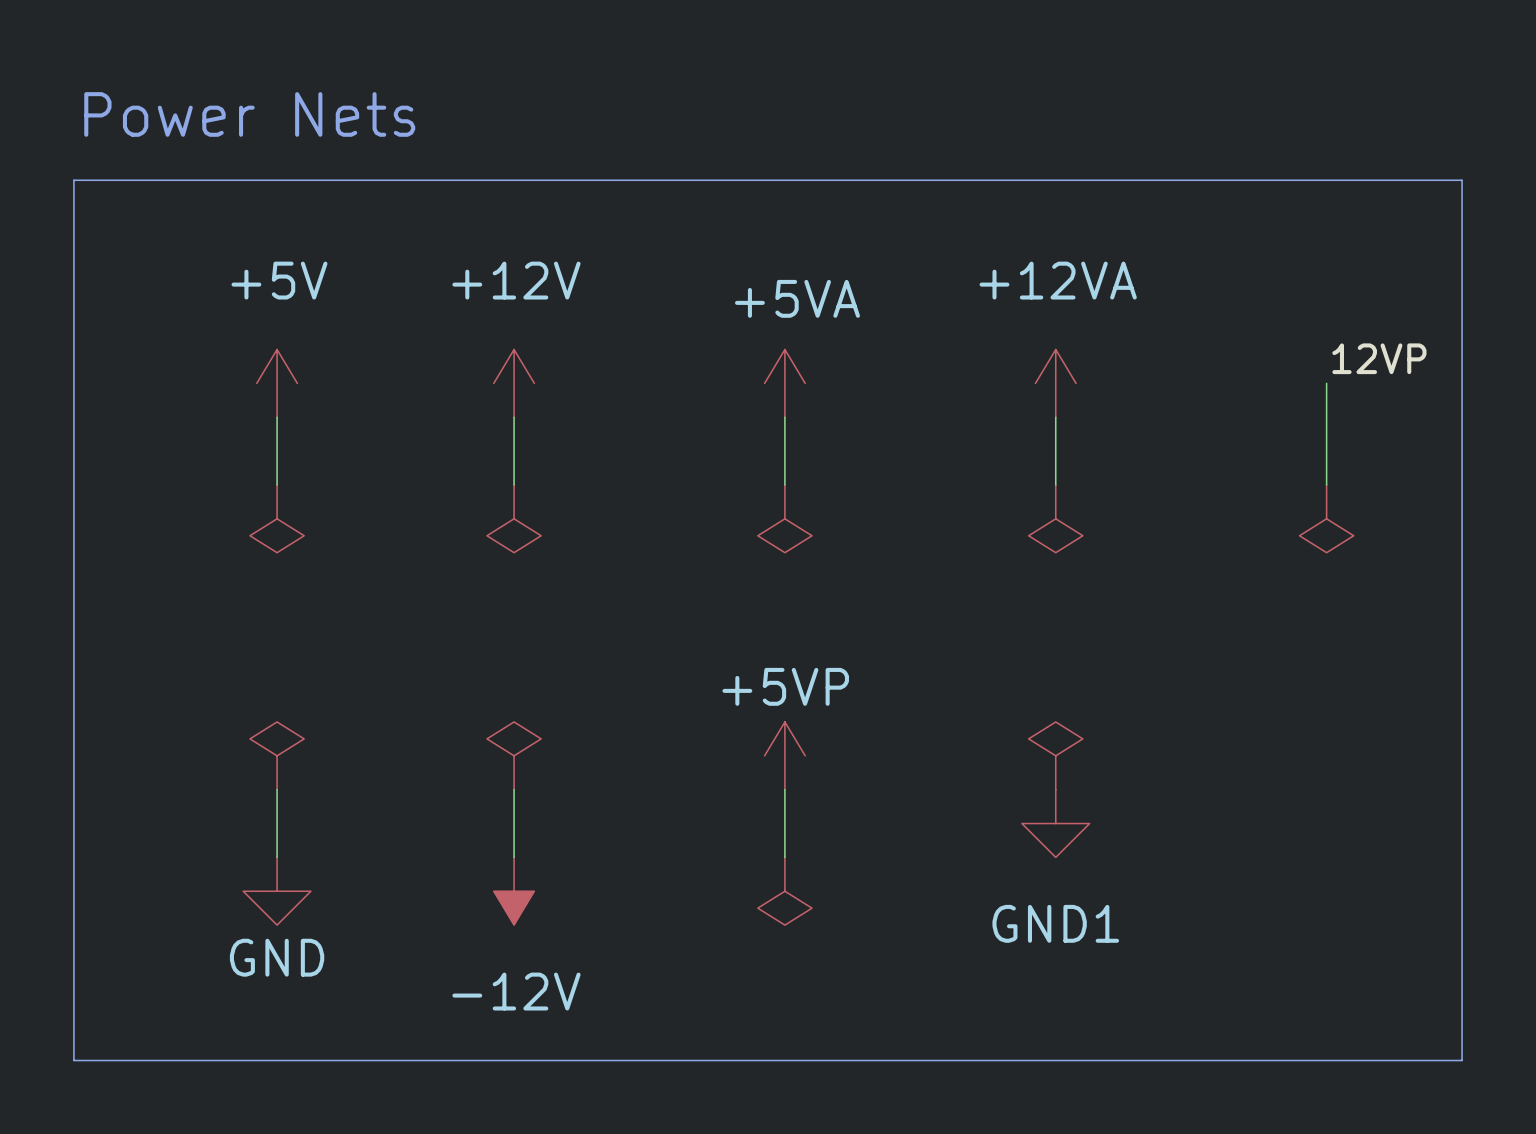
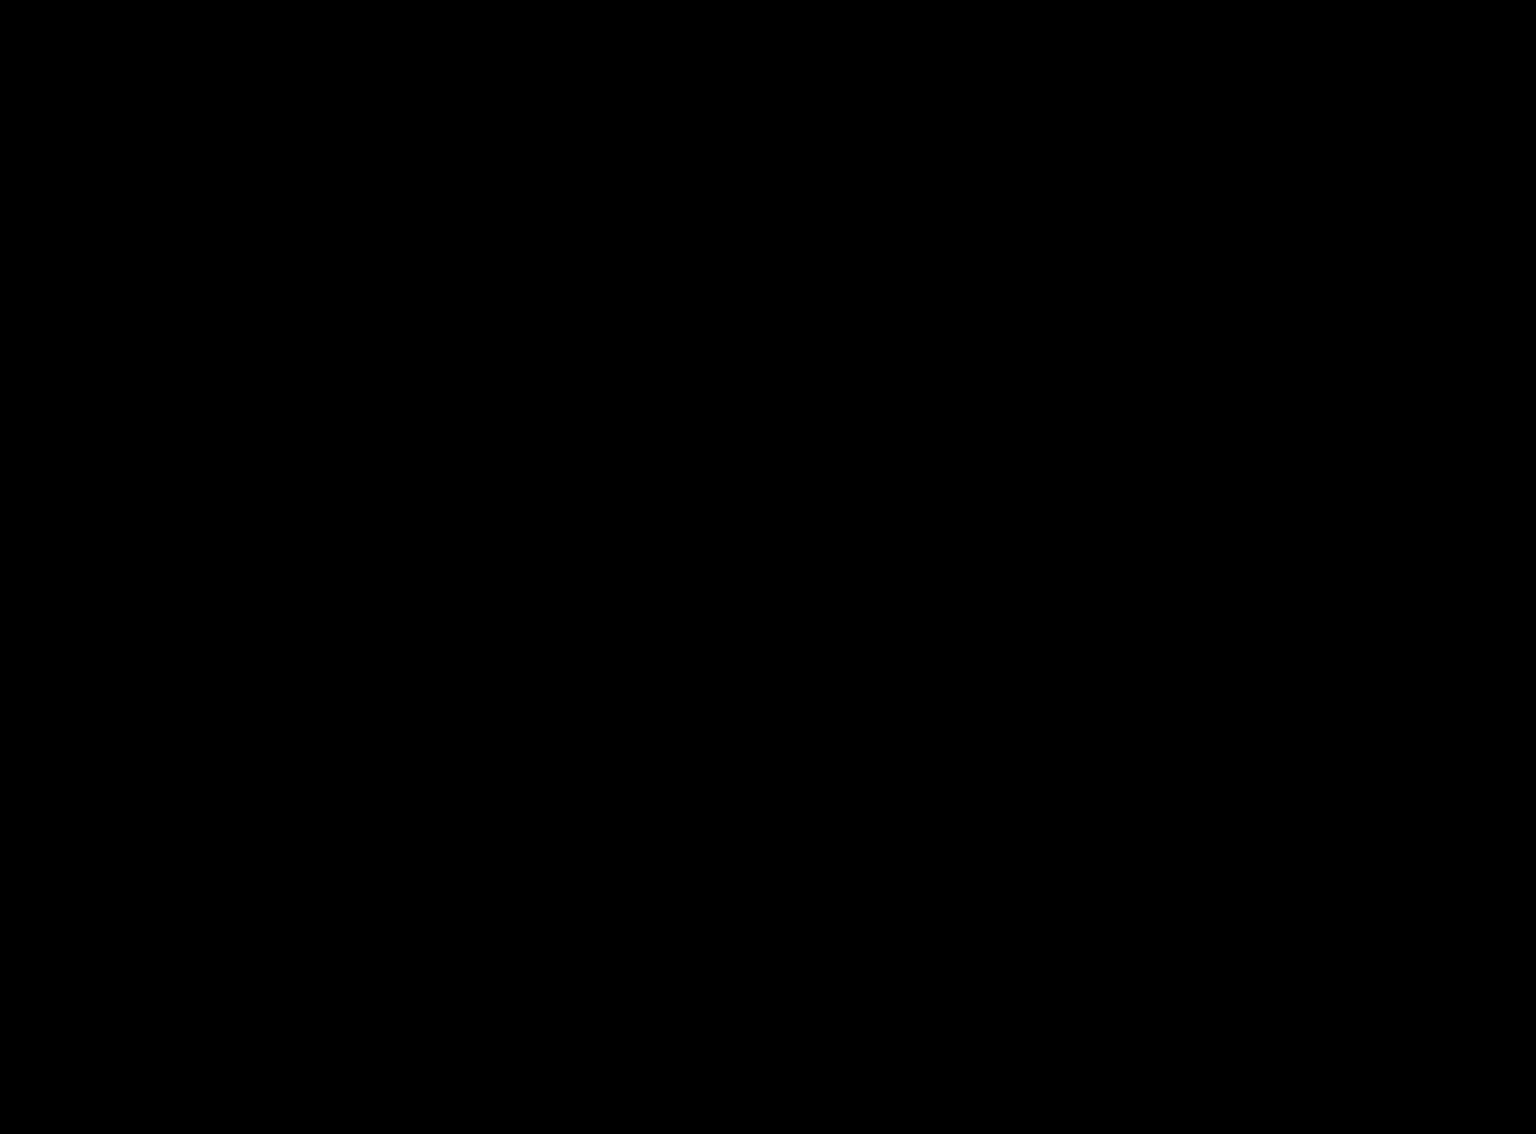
text: Power Nets (249, 114) -> none
line: (73, 180) (1462, 180) (1462, 1060) (73, 1060) (73, 180) -> none
label: 12VP (1379, 358) -> none
power symbol: +5V (277, 383) -> none
power symbol: +12V (514, 383) -> none
power symbol: +5VA (784, 383) -> none
power symbol: +12VA (1055, 383) -> none
wire: (1326, 383) (1326, 484) -> none
wire: (277, 417) (277, 484) -> none
wire: (514, 417) (514, 484) -> none
wire: (784, 417) (784, 484) -> none
wire: (1055, 417) (1055, 484) -> none
power symbol: (277, 518) -> none
power symbol: (514, 518) -> none
power symbol: (784, 518) -> none
power symbol: (1055, 518) -> none
power symbol: (1326, 518) -> none
power symbol: (277, 755) -> none
power symbol: (514, 755) -> none
power symbol: +5VP (784, 755) -> none
power symbol: (1055, 755) -> none
wire: (277, 789) (277, 857) -> none
wire: (514, 789) (514, 857) -> none
wire: (784, 789) (784, 857) -> none
power symbol: GND1 (1055, 823) -> none
power symbol: GND (277, 891) -> none
power symbol: -12V (514, 891) -> none
power symbol: (784, 891) -> none

